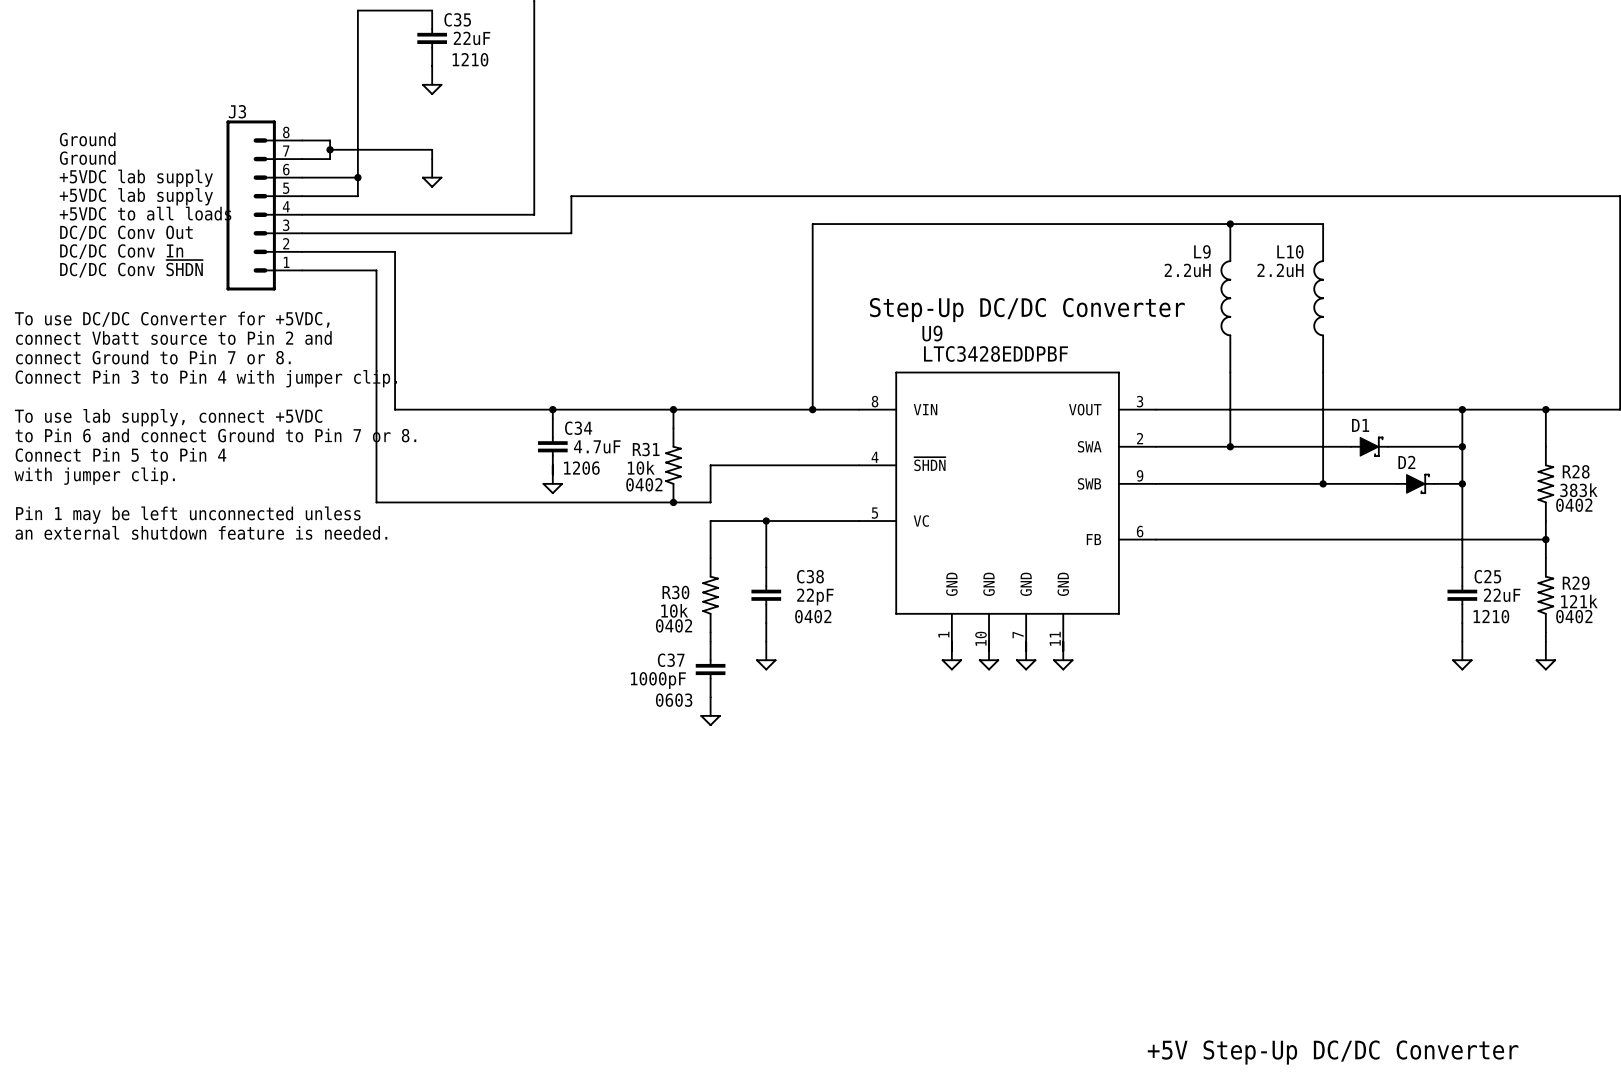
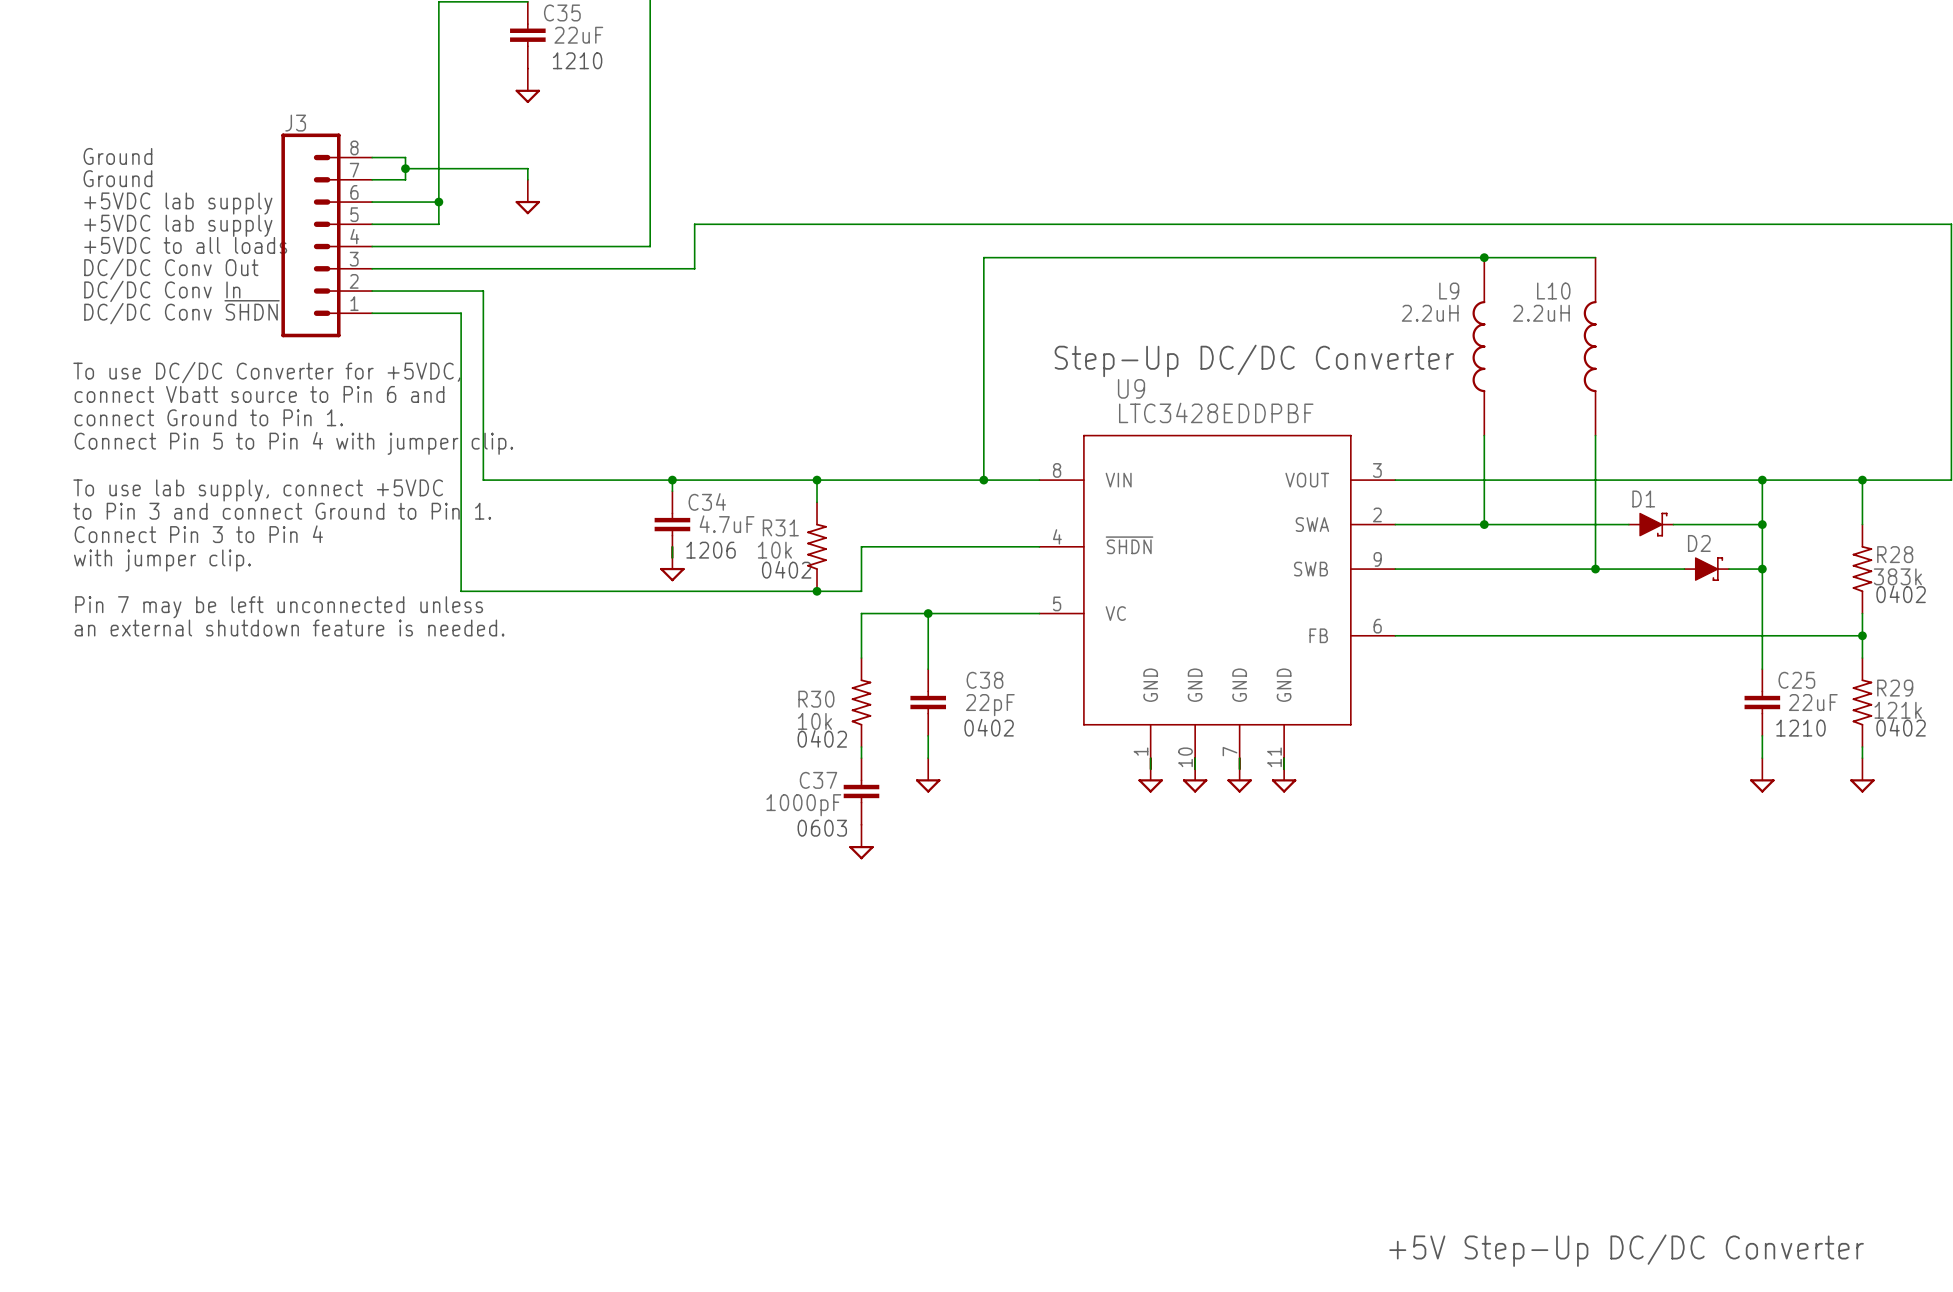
text position: To use DC/DC Converter for +5VDC, (172, 319) -> To use DC/DC Converter for +5VDC, (266, 372)
text: connect Vbatt source to Pin 2 and (173, 338) -> none
text: none -> connect Vbatt source to Pin 6 and (259, 394)
text: connect Ground to Pin 7 or 8. (153, 357) -> none
text: none -> connect Ground to Pin 1. (208, 417)
text: Connect Pin 3 to Pin 4 with jumper clip. (206, 378) -> Connect Pin 5 to Pin 4 with jumper clip. (293, 443)
text position: To use lab supply, connect +5VDC (168, 417) -> To use lab supply, connect +5VDC (258, 490)
text: to Pin 6 and connect Ground to Pin 7 or 8. (215, 435) -> to Pin 3 and connect Ground to Pin 1. (282, 511)
text: Connect Pin 5 to Pin 4 (120, 454) -> Connect Pin 3 to Pin 4 (198, 534)
text position: with jumper clip. (94, 476) -> with jumper clip. (162, 560)
text: Pin 1 may be left unconnected unless (188, 515) -> Pin 7 may be left unconnected unless (279, 607)
text position: an external shutdown feature is needed. (201, 532) -> an external shutdown feature is needed. (289, 628)

